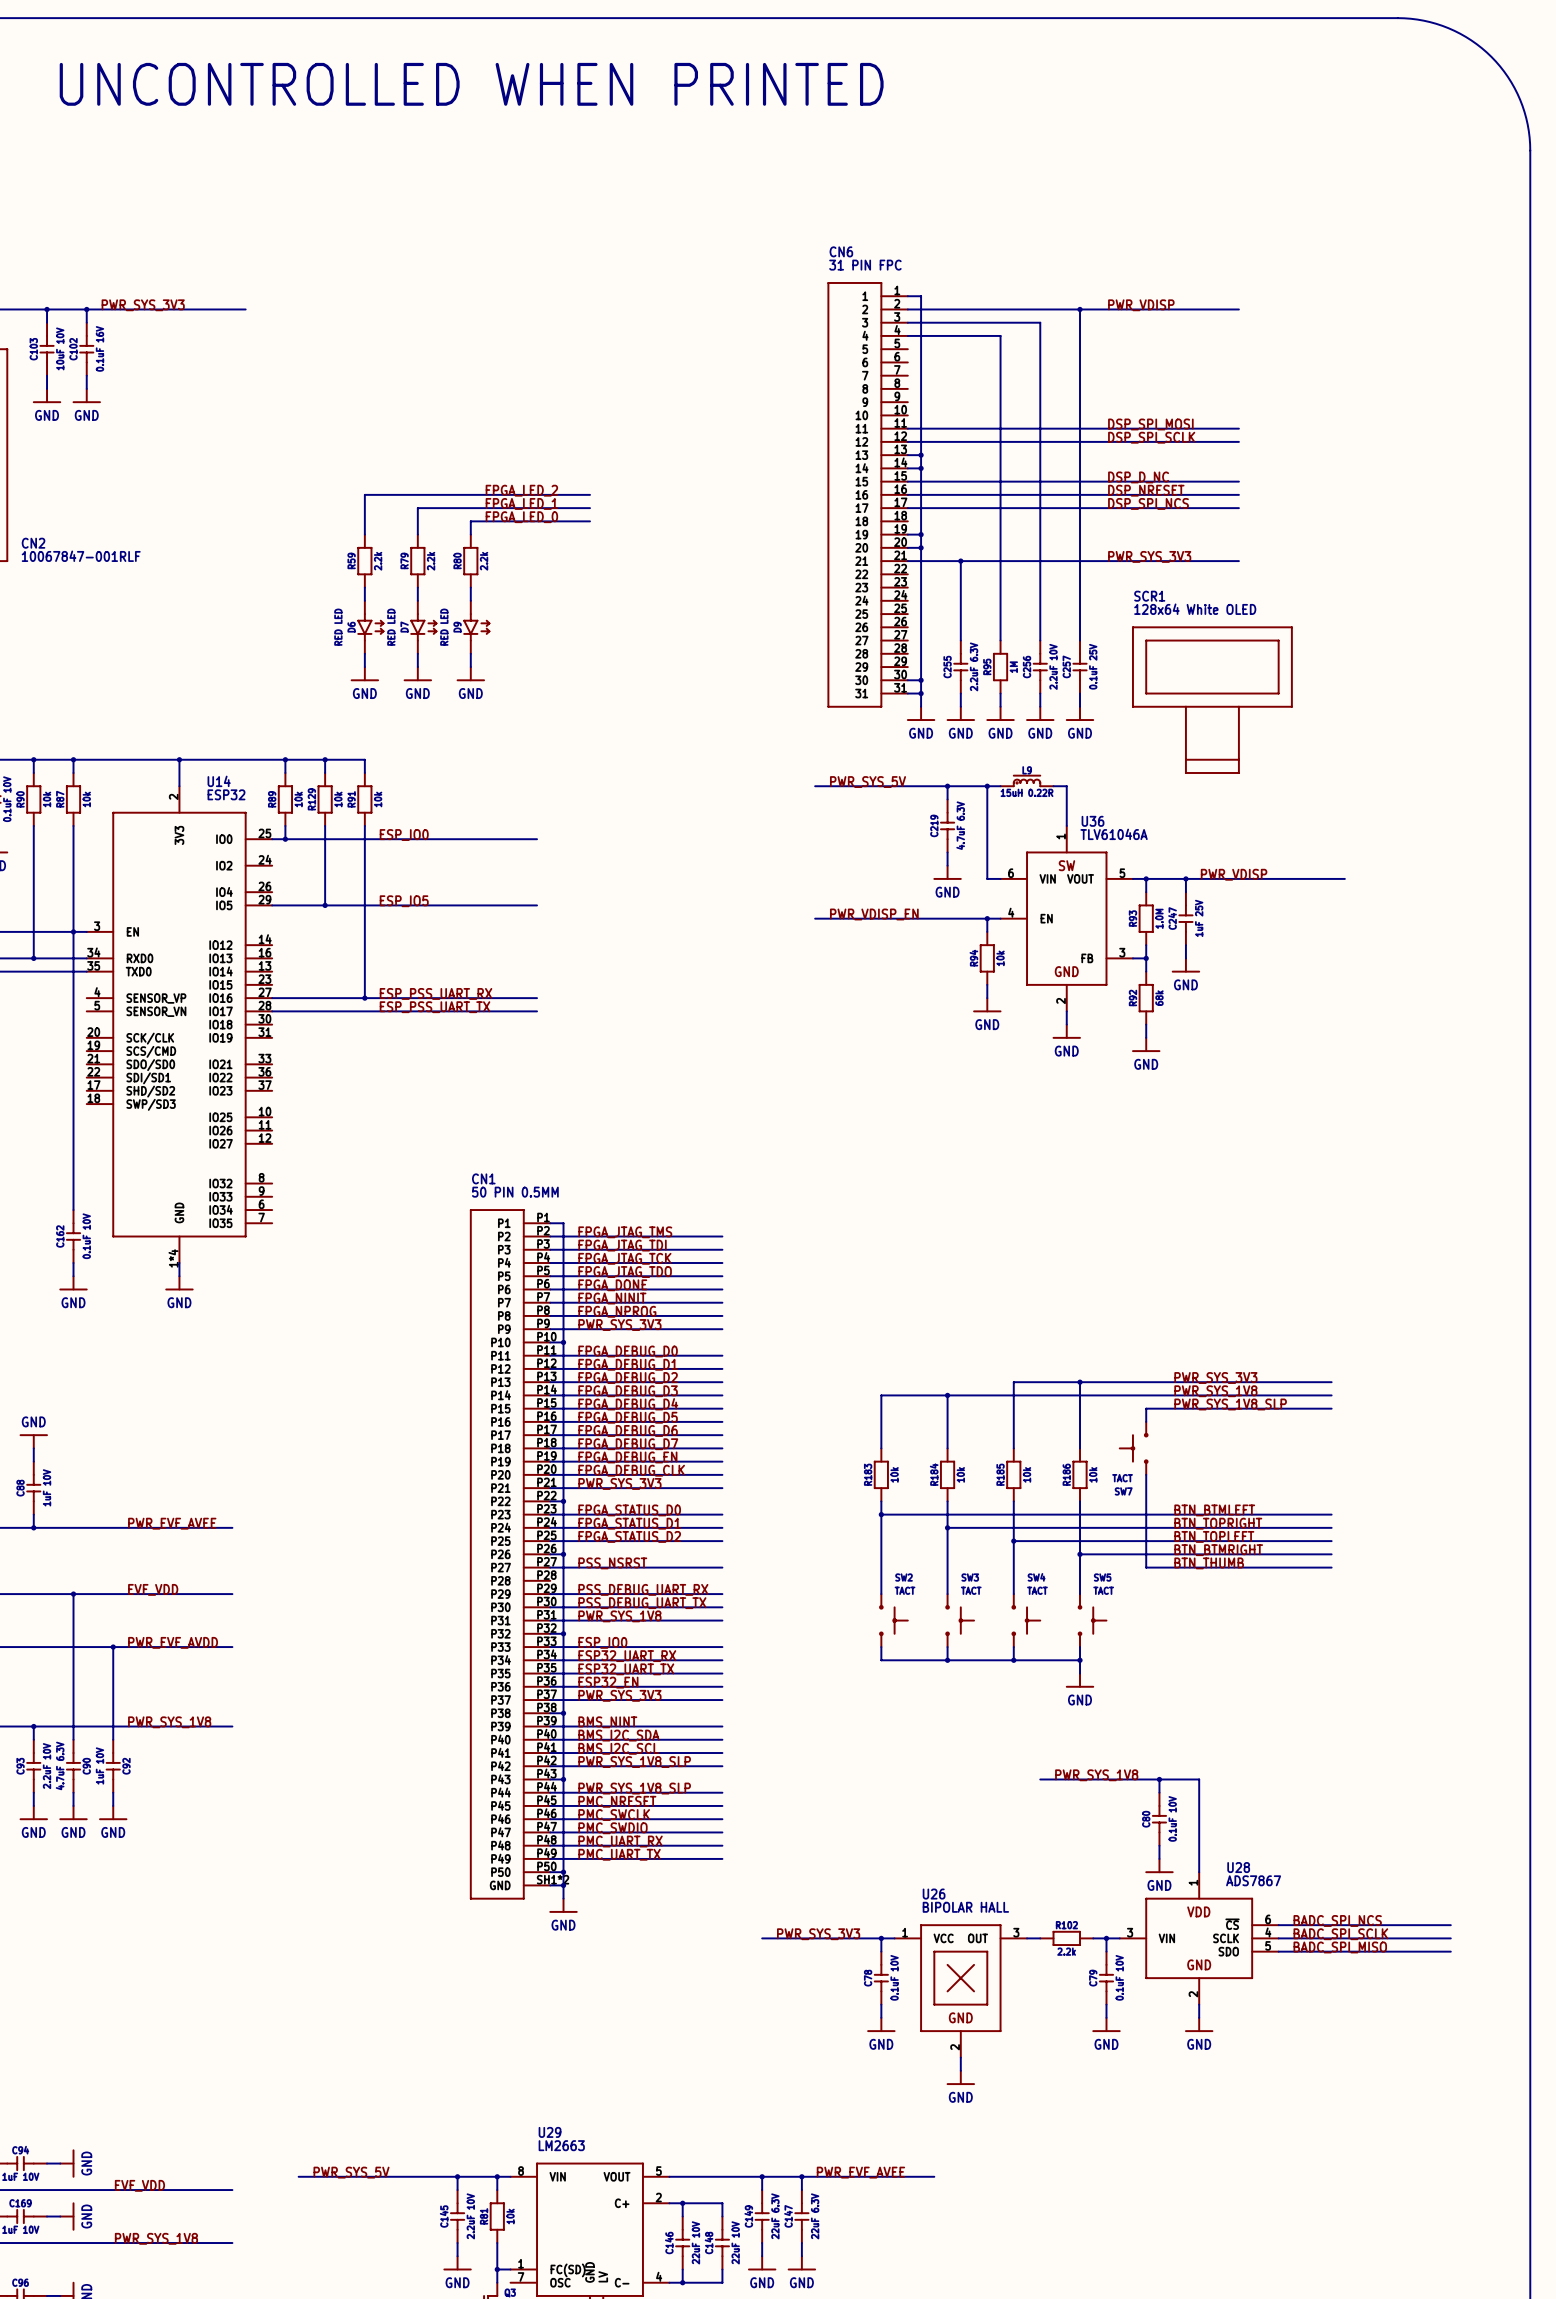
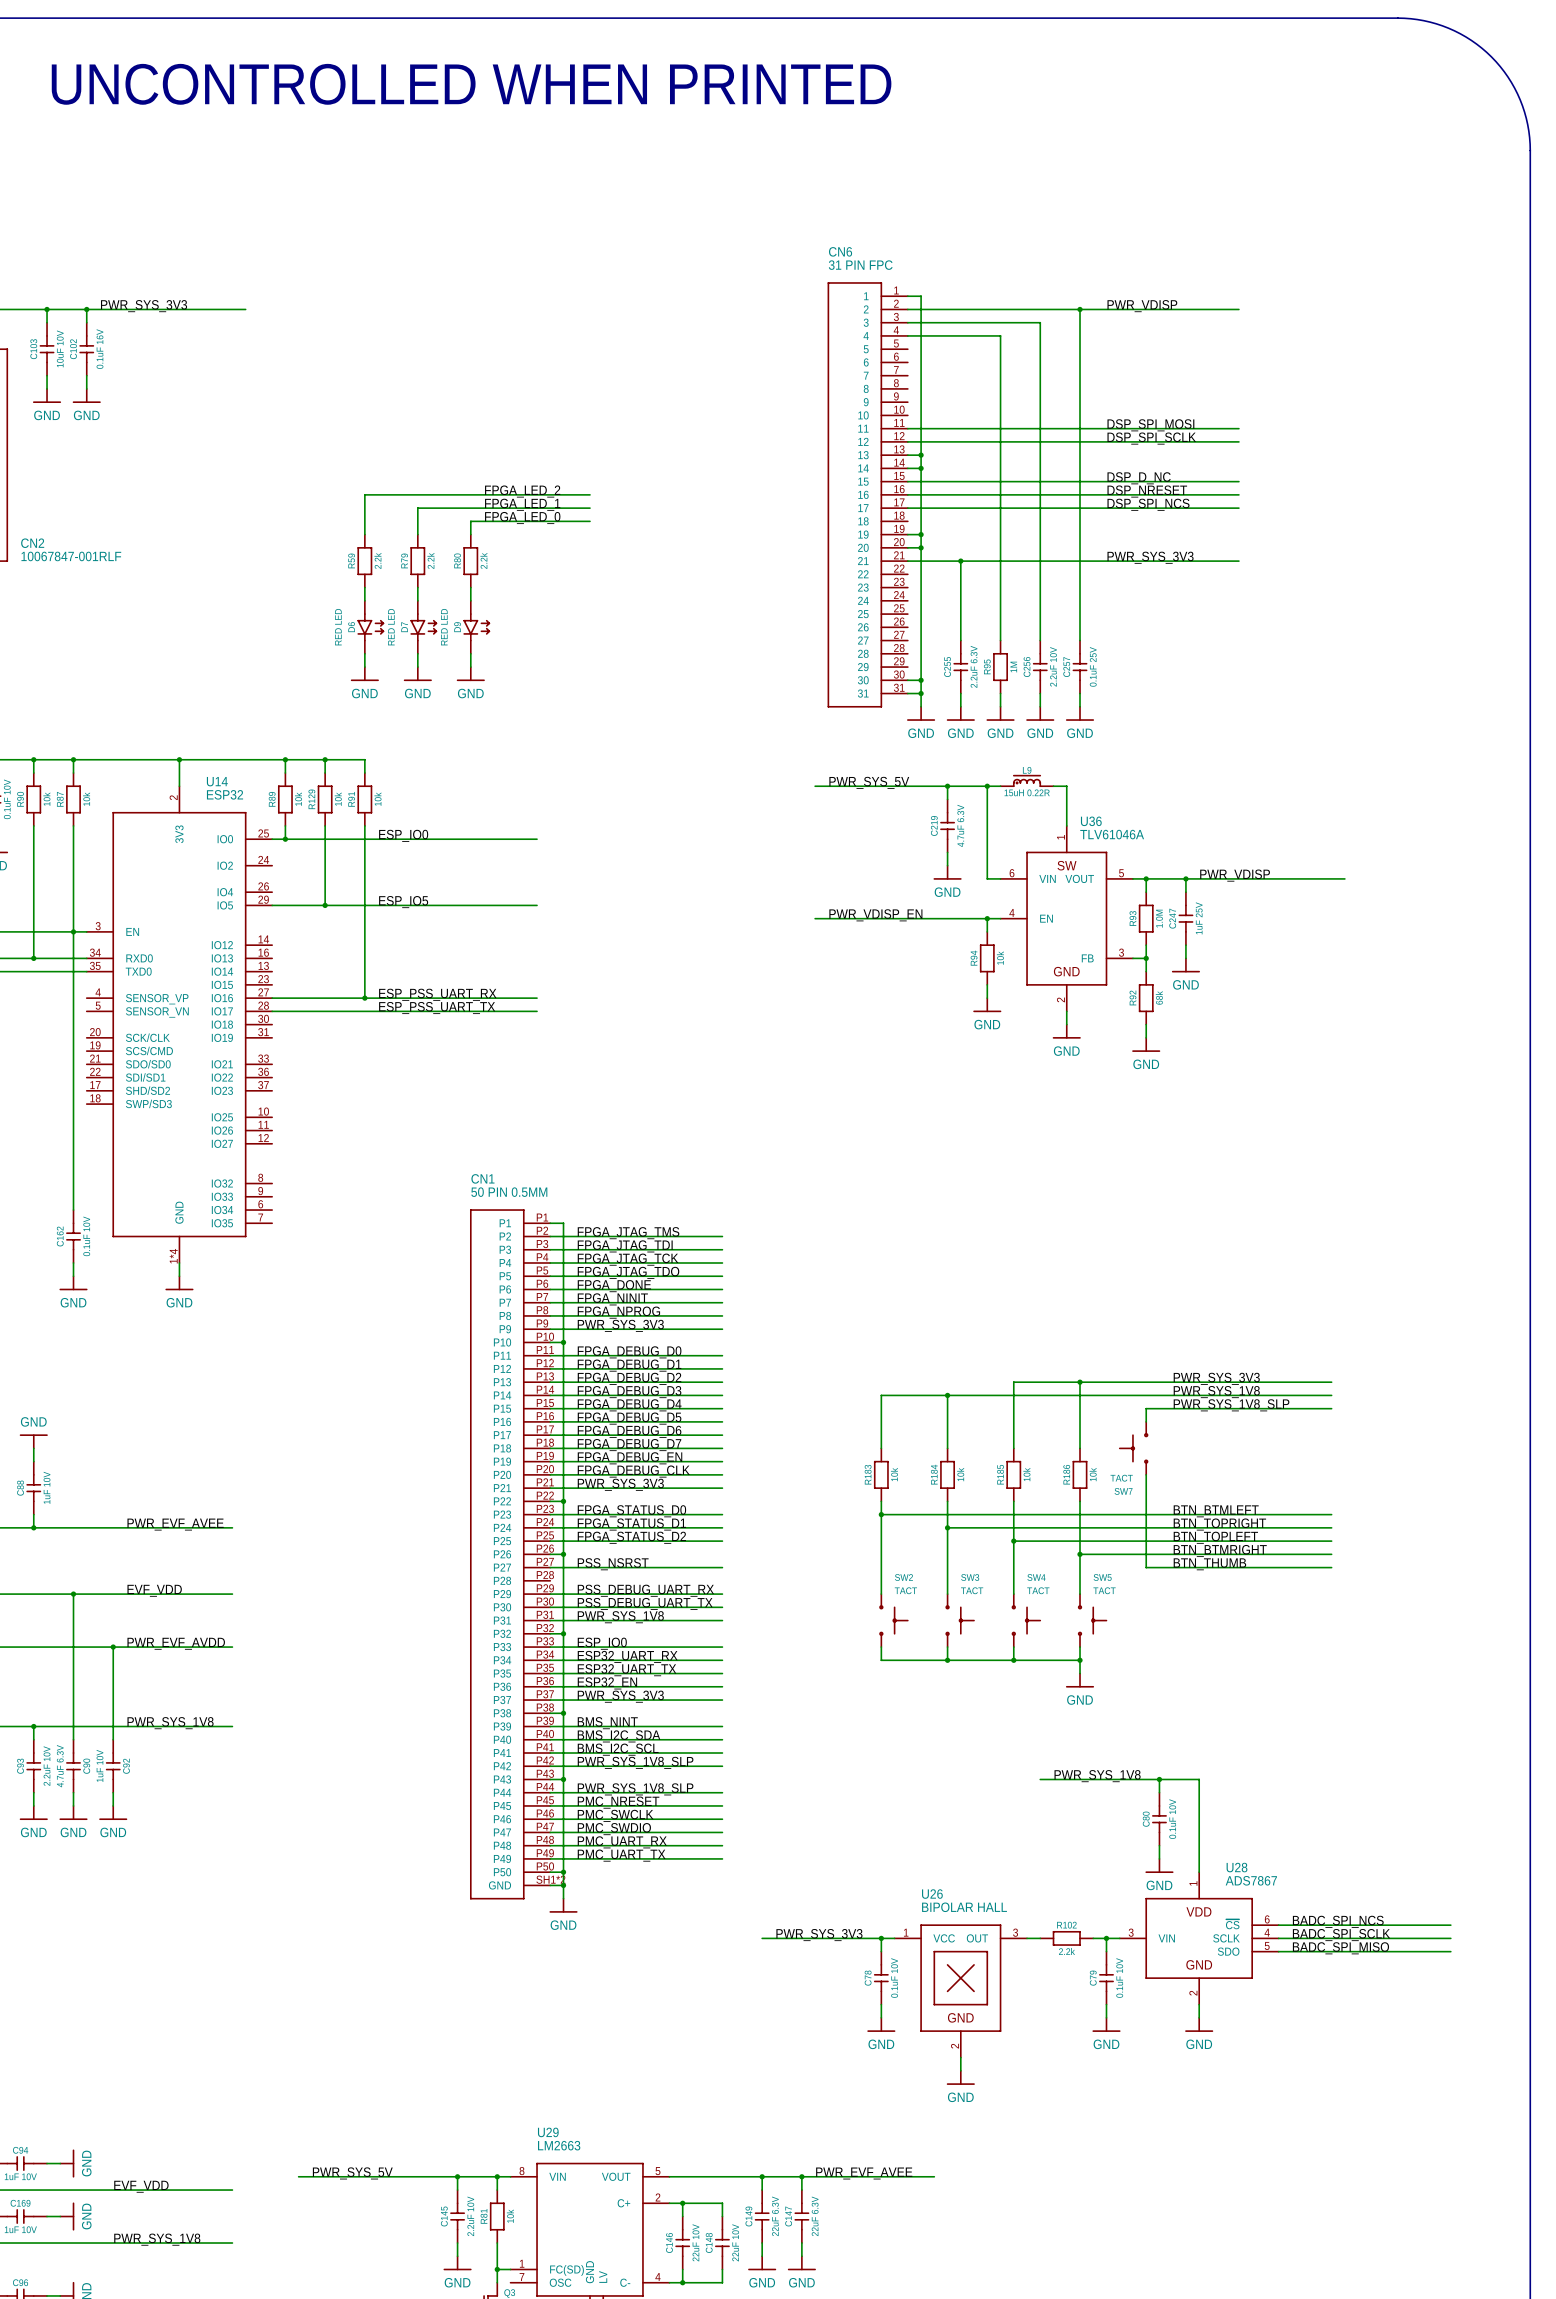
SCR1: 128x64 White OLED (1212, 700) -> none

